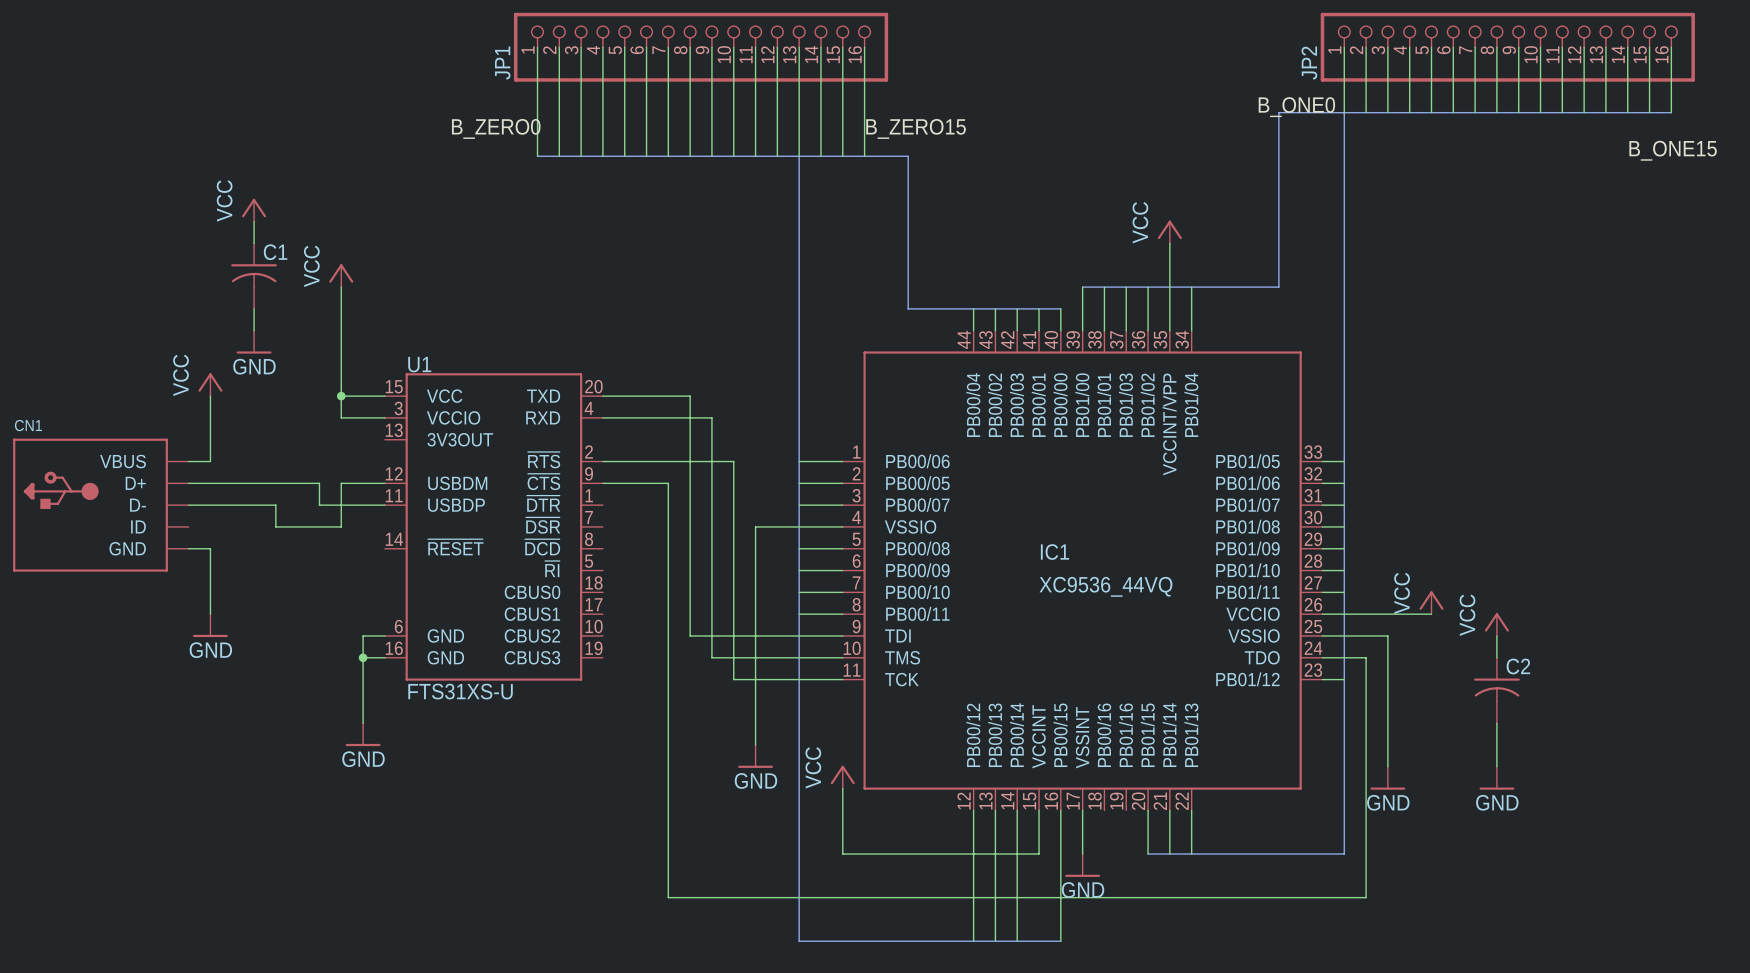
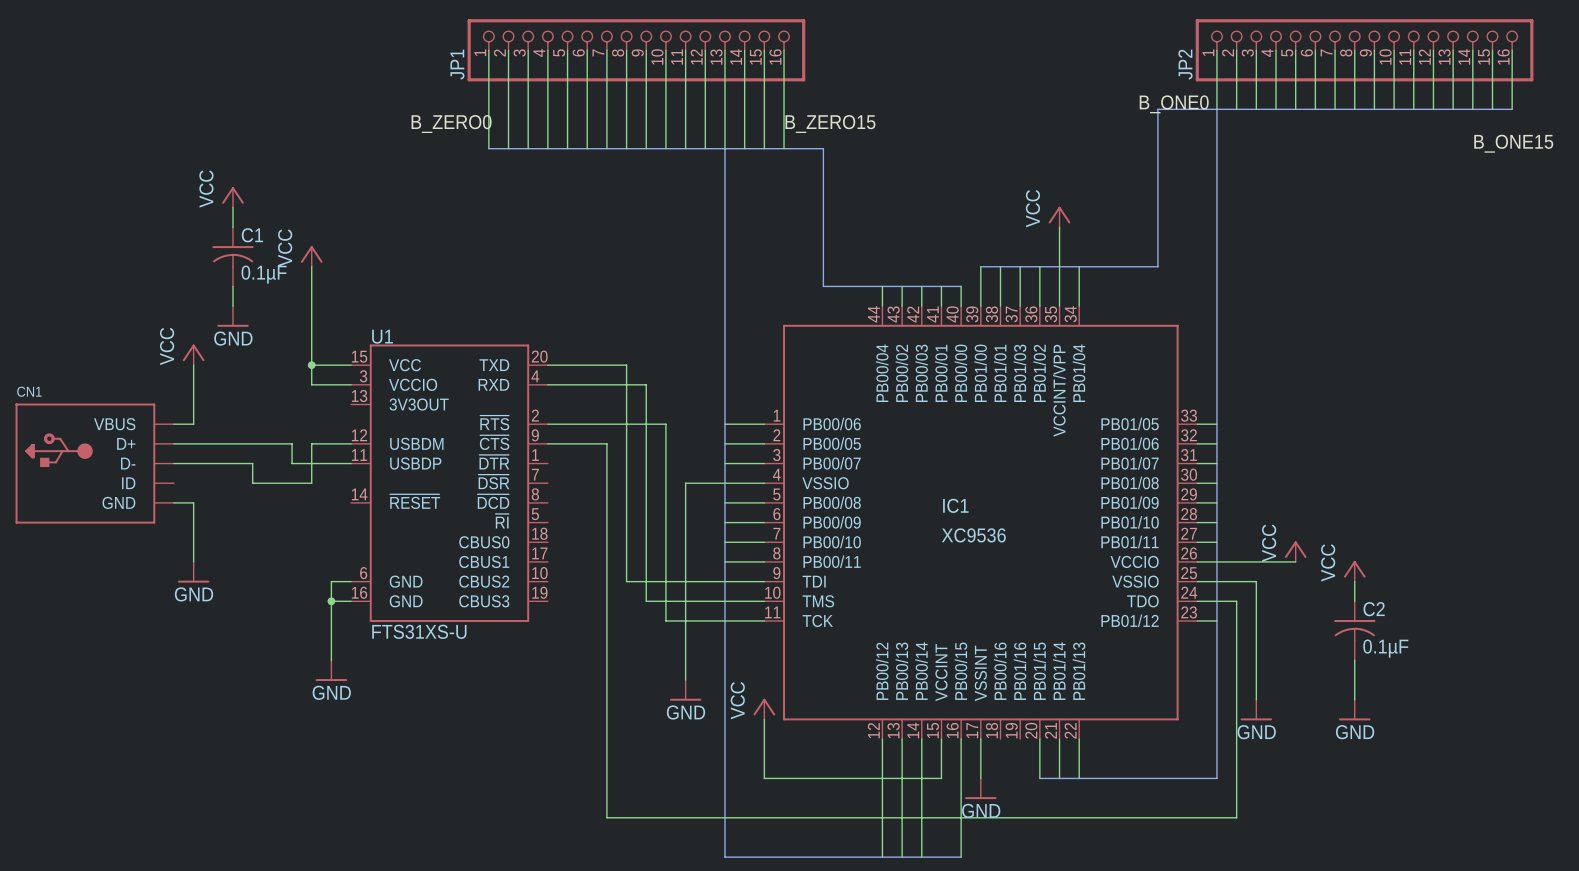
C1 value: none -> 0.1µF (264, 274)
IC1 value: XC9536_44VQ (1105, 586) -> XC9536 (973, 535)
C2 value: none -> 0.1µF (1385, 648)

